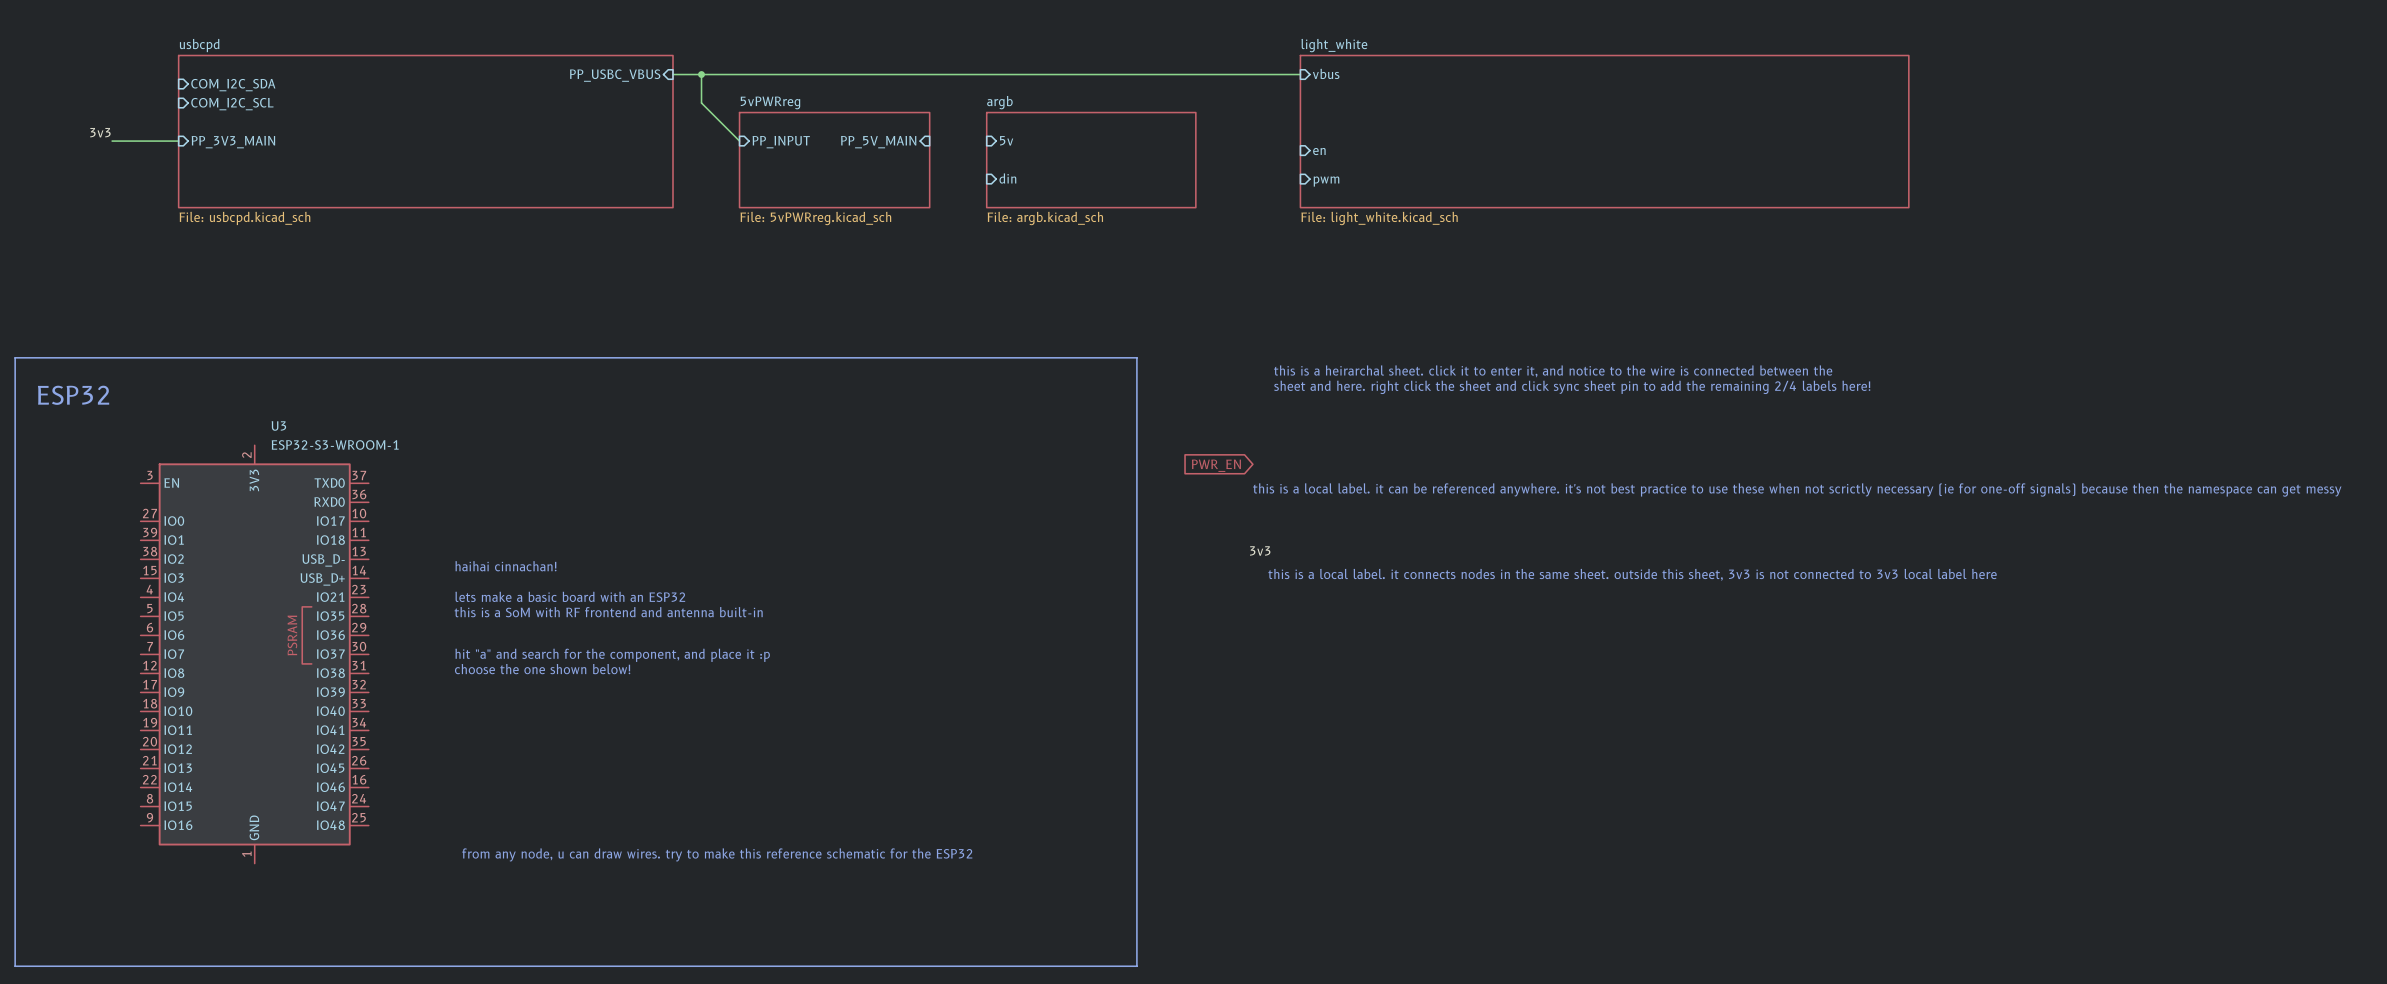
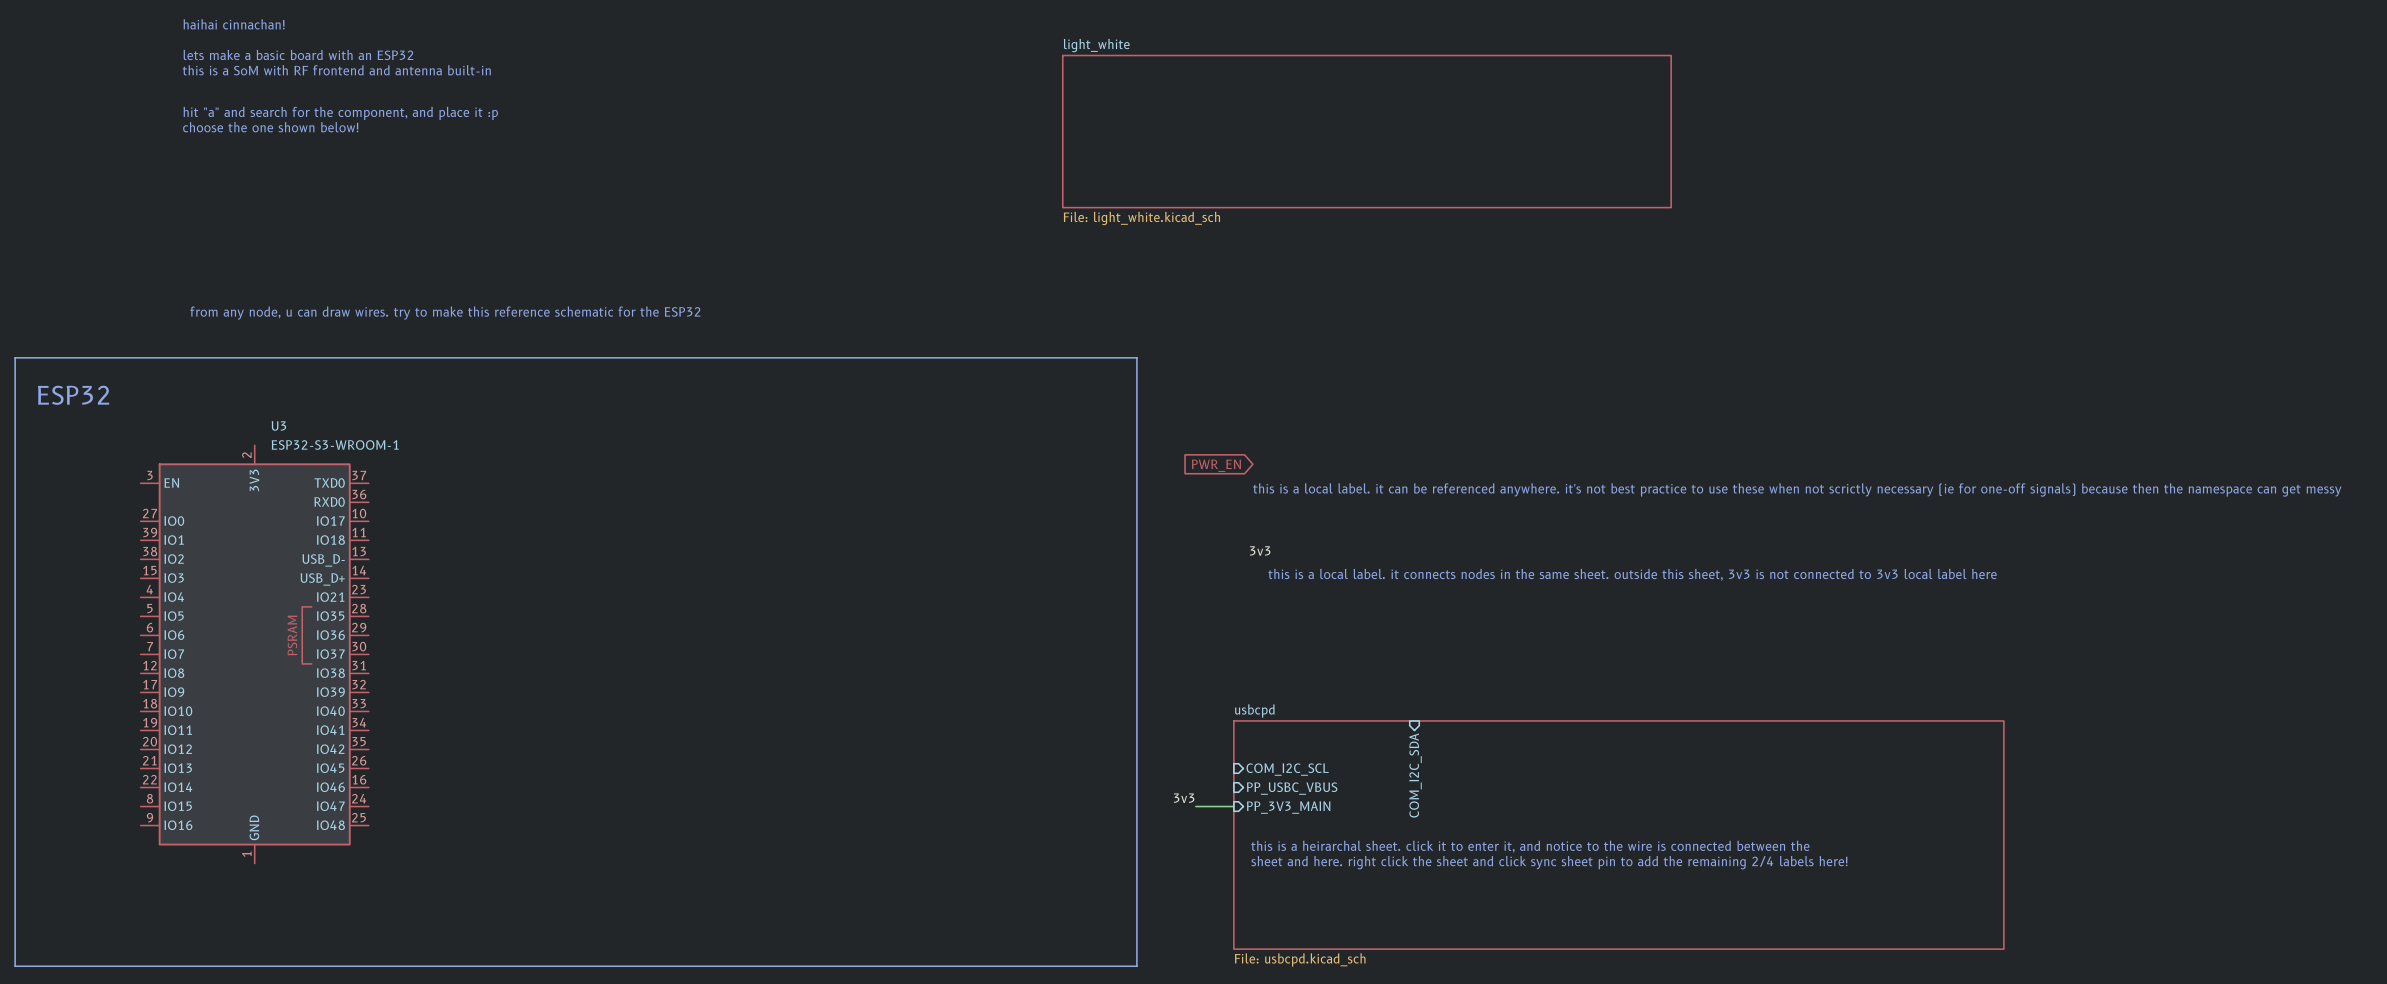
text: none -> haihai cinnachan! (234, 24)
text: none -> lets make a basic board with an ESP32 (298, 54)
text: none -> this is a SoM with RF frontend and antenna built-in (336, 70)
sheet pin: vbus (1326, 73) -> none
wire: (672, 74) (1300, 74) -> none
wire: (701, 74) (701, 103) (739, 141) -> none
junction: (701, 74) -> none
sheet pin: PP_USBC_VBUS (615, 75) -> none
sheet pin: COM_I2C_SDA (233, 85) -> none
sheet pin: COM_I2C_SCL (232, 104) -> none
text: none -> hit "a" and search for the component, and place it :p (340, 113)
text: none -> choose the one shown below! (270, 127)
sheet usbcpd: File: usbcpd.kicad_sch (425, 131) -> none
sheet light_white: none -> File: light_white.kicad_sch (1366, 131)
sheet light_white: File: light_white.kicad_sch (1604, 131) -> none
label: 3v3 (100, 132) -> none
sheet pin: 5v (1006, 140) -> none
wire: (112, 141) (178, 141) -> none
sheet pin: PP_3V3_MAIN (233, 142) -> none
sheet pin: PP_INPUT (781, 142) -> none
sheet pin: PP_5V_MAIN (878, 142) -> none
sheet pin: en (1319, 151) -> none
sheet 5vPWRreg: File: 5vPWRreg.kicad_sch (834, 160) -> none
sheet argb: File: argb.kicad_sch (1091, 160) -> none
sheet pin: din (1007, 178) -> none
sheet pin: pwm (1326, 181) -> none
text: none -> from any node, u can draw wires. try to make this reference schematic for the ESP32 (445, 313)
text: this is a heirarchal sheet. click it to enter it, and notice to the wire is connected between the (1553, 371) -> none
text: sheet and here. right click the sheet and click sync sheet pin to add the remaining 2/4 labels here! (1572, 387) -> none
text: haihai cinnachan! (505, 566) -> none
text: lets make a basic board with an ESP32 (570, 596) -> none
text: this is a SoM with RF frontend and antenna built-in (608, 612) -> none
text: hit "a" and search for the component, and place it :p (612, 655) -> none
text: choose the one shown below! (542, 669) -> none
sheet pin: none -> COM_I2C_SCL (1287, 769)
sheet pin: none -> COM_I2C_SDA (1415, 775)
sheet pin: none -> PP_USBC_VBUS (1292, 788)
label: none -> 3v3 (1184, 798)
wire: none -> (1195, 806) (1233, 806)
sheet pin: none -> PP_3V3_MAIN (1288, 807)
sheet usbcpd: none -> File: usbcpd.kicad_sch (1618, 835)
text: none -> this is a heirarchal sheet. click it to enter it, and notice to the wire is connected between the (1530, 846)
text: from any node, u can draw wires. try to make this reference schematic for the ESP32 (717, 854) -> none
text: none -> sheet and here. right click the sheet and click sync sheet pin to add the remaining 2/4 labels here! (1549, 862)

